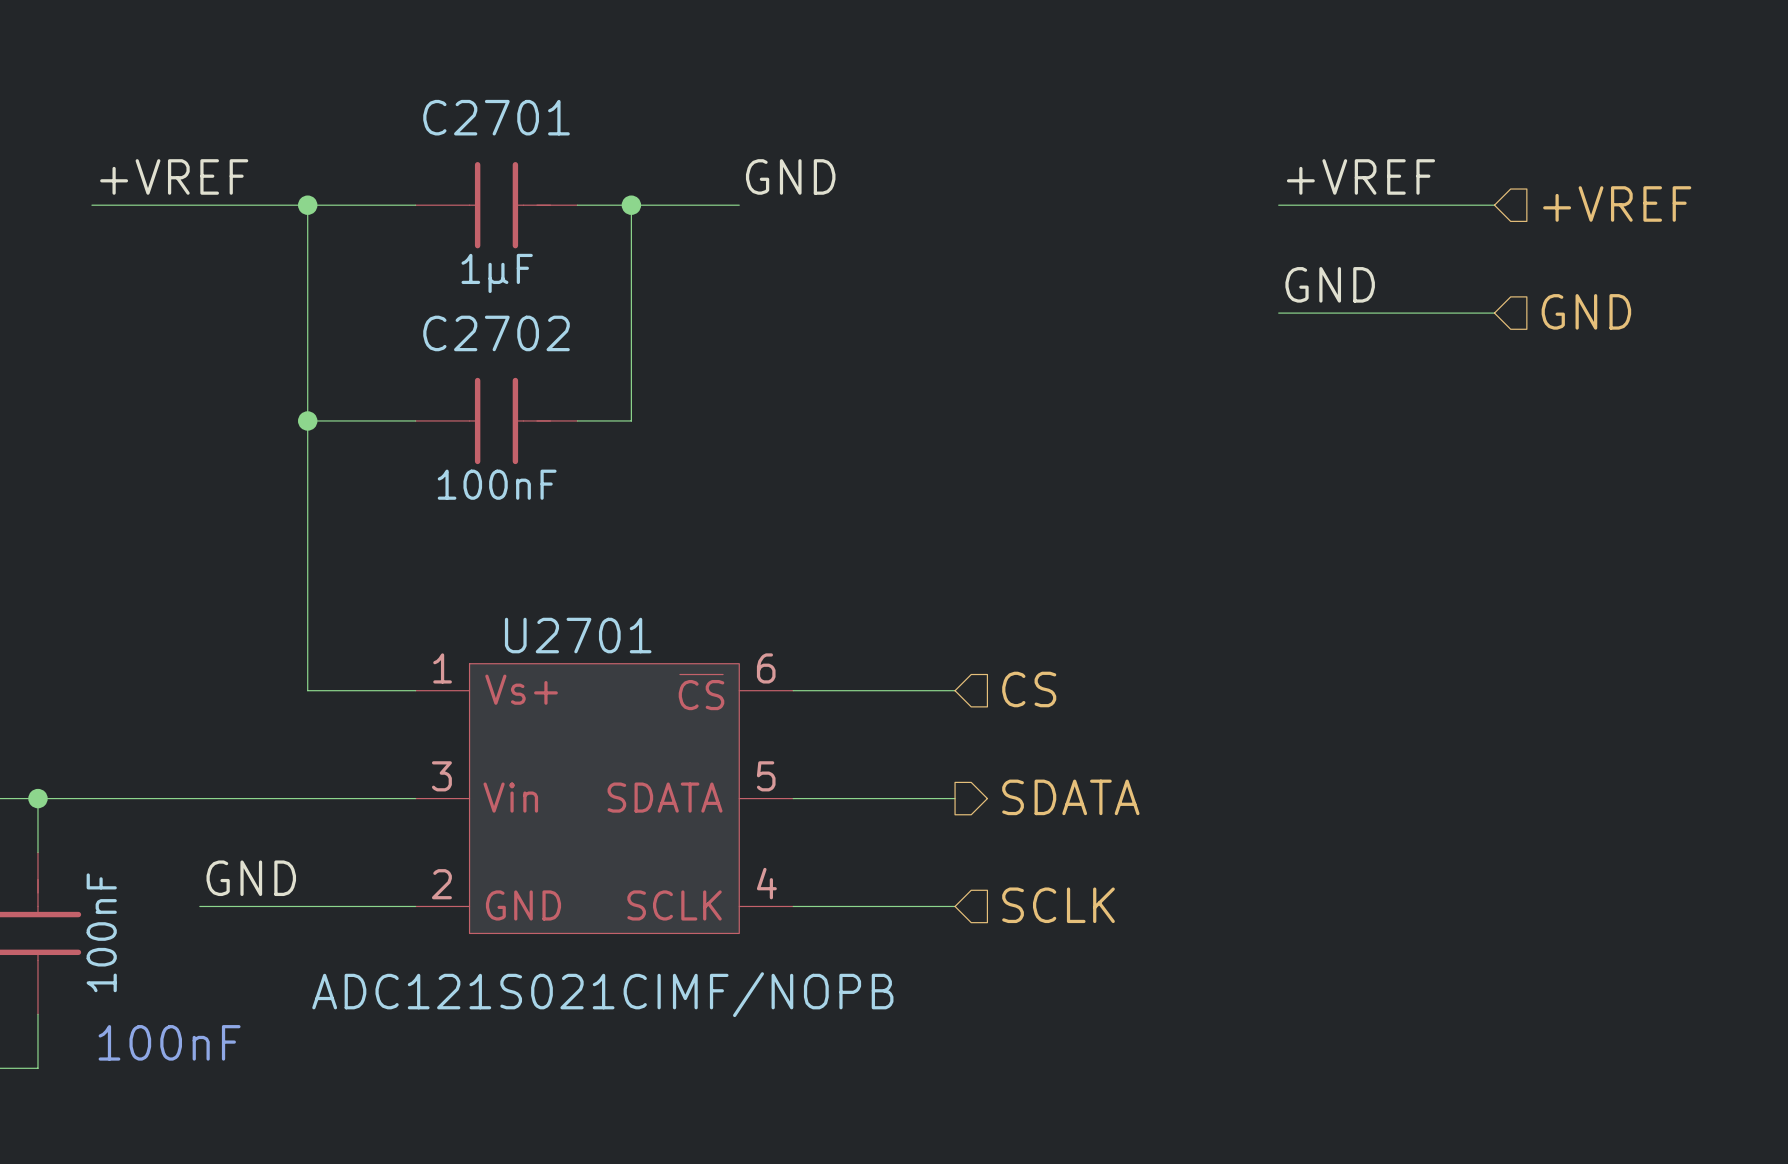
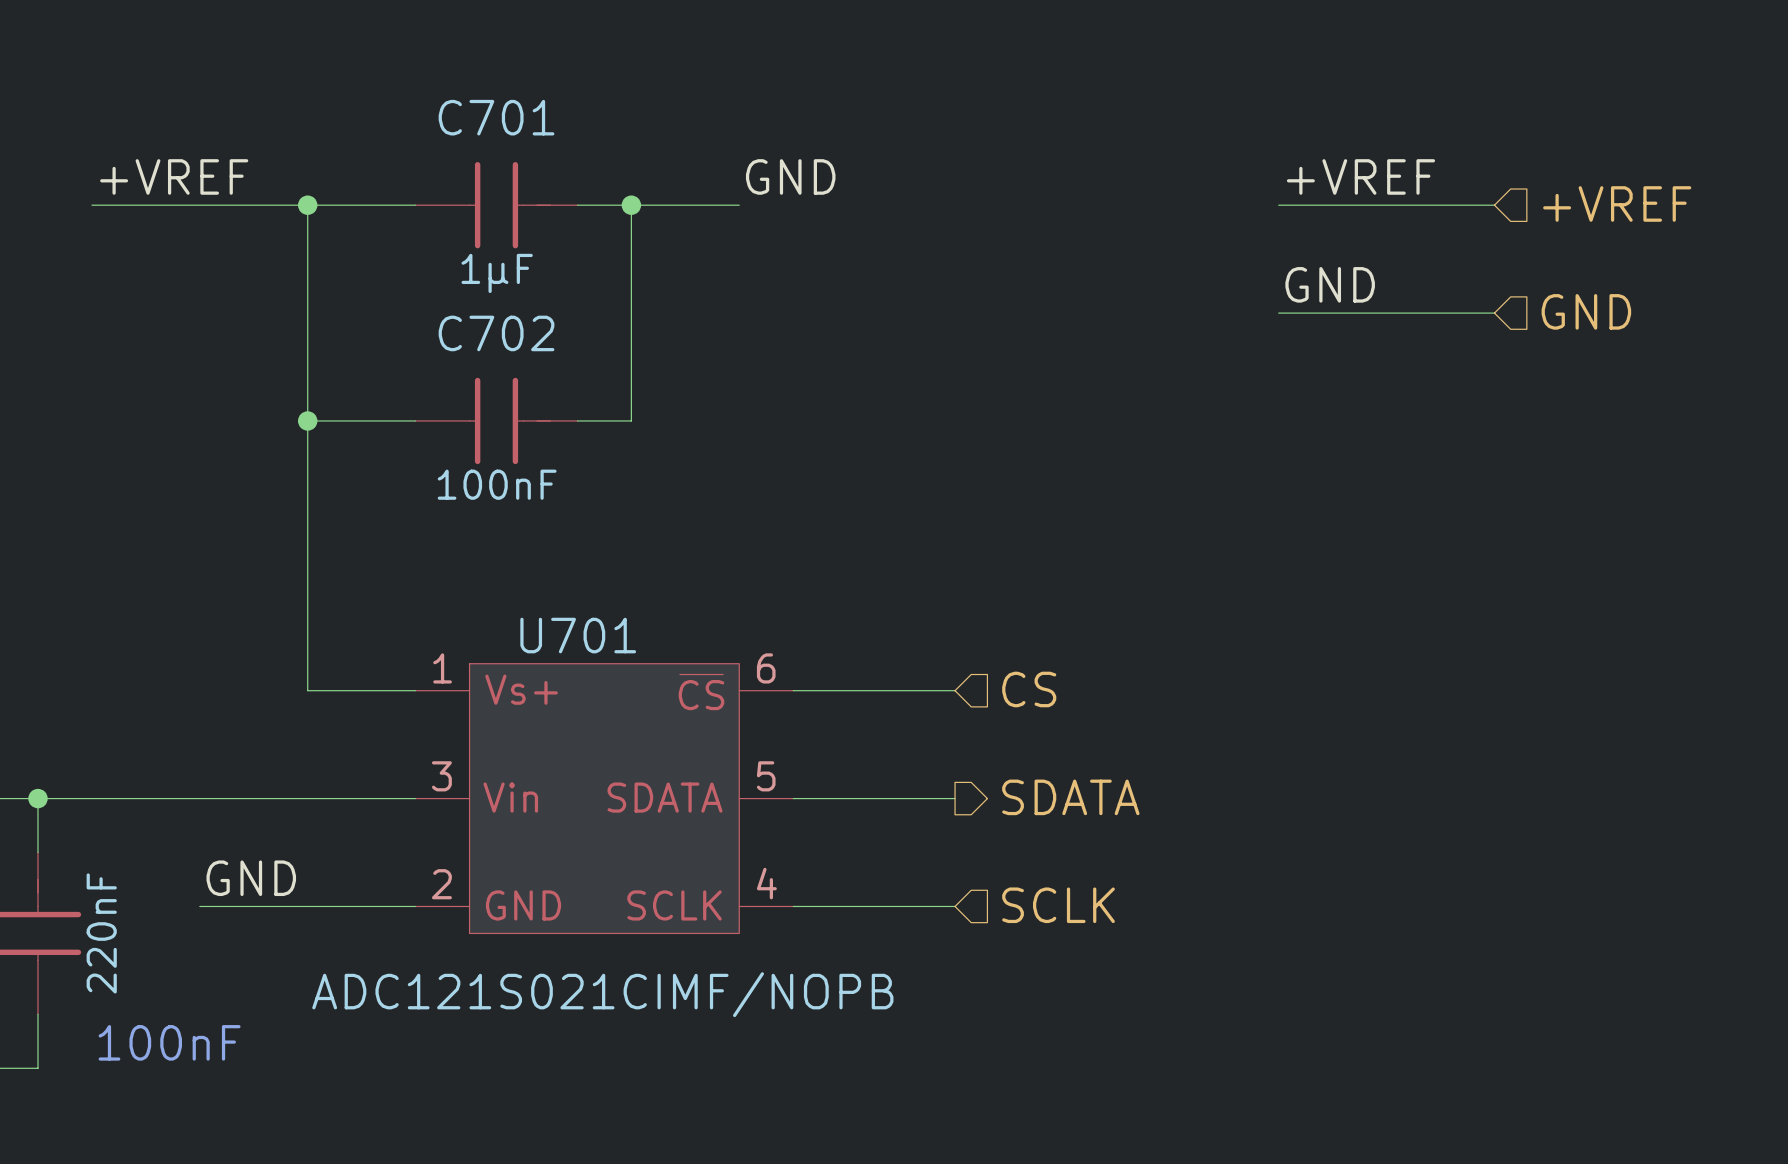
C2701 name: C2701 (496, 117) -> C701 (496, 117)
C2702 name: C2702 (496, 333) -> C702 (496, 333)
U2701 name: U2701 (578, 635) -> U701 (578, 635)
part text: 100nF (101, 932) -> 220nF (101, 933)

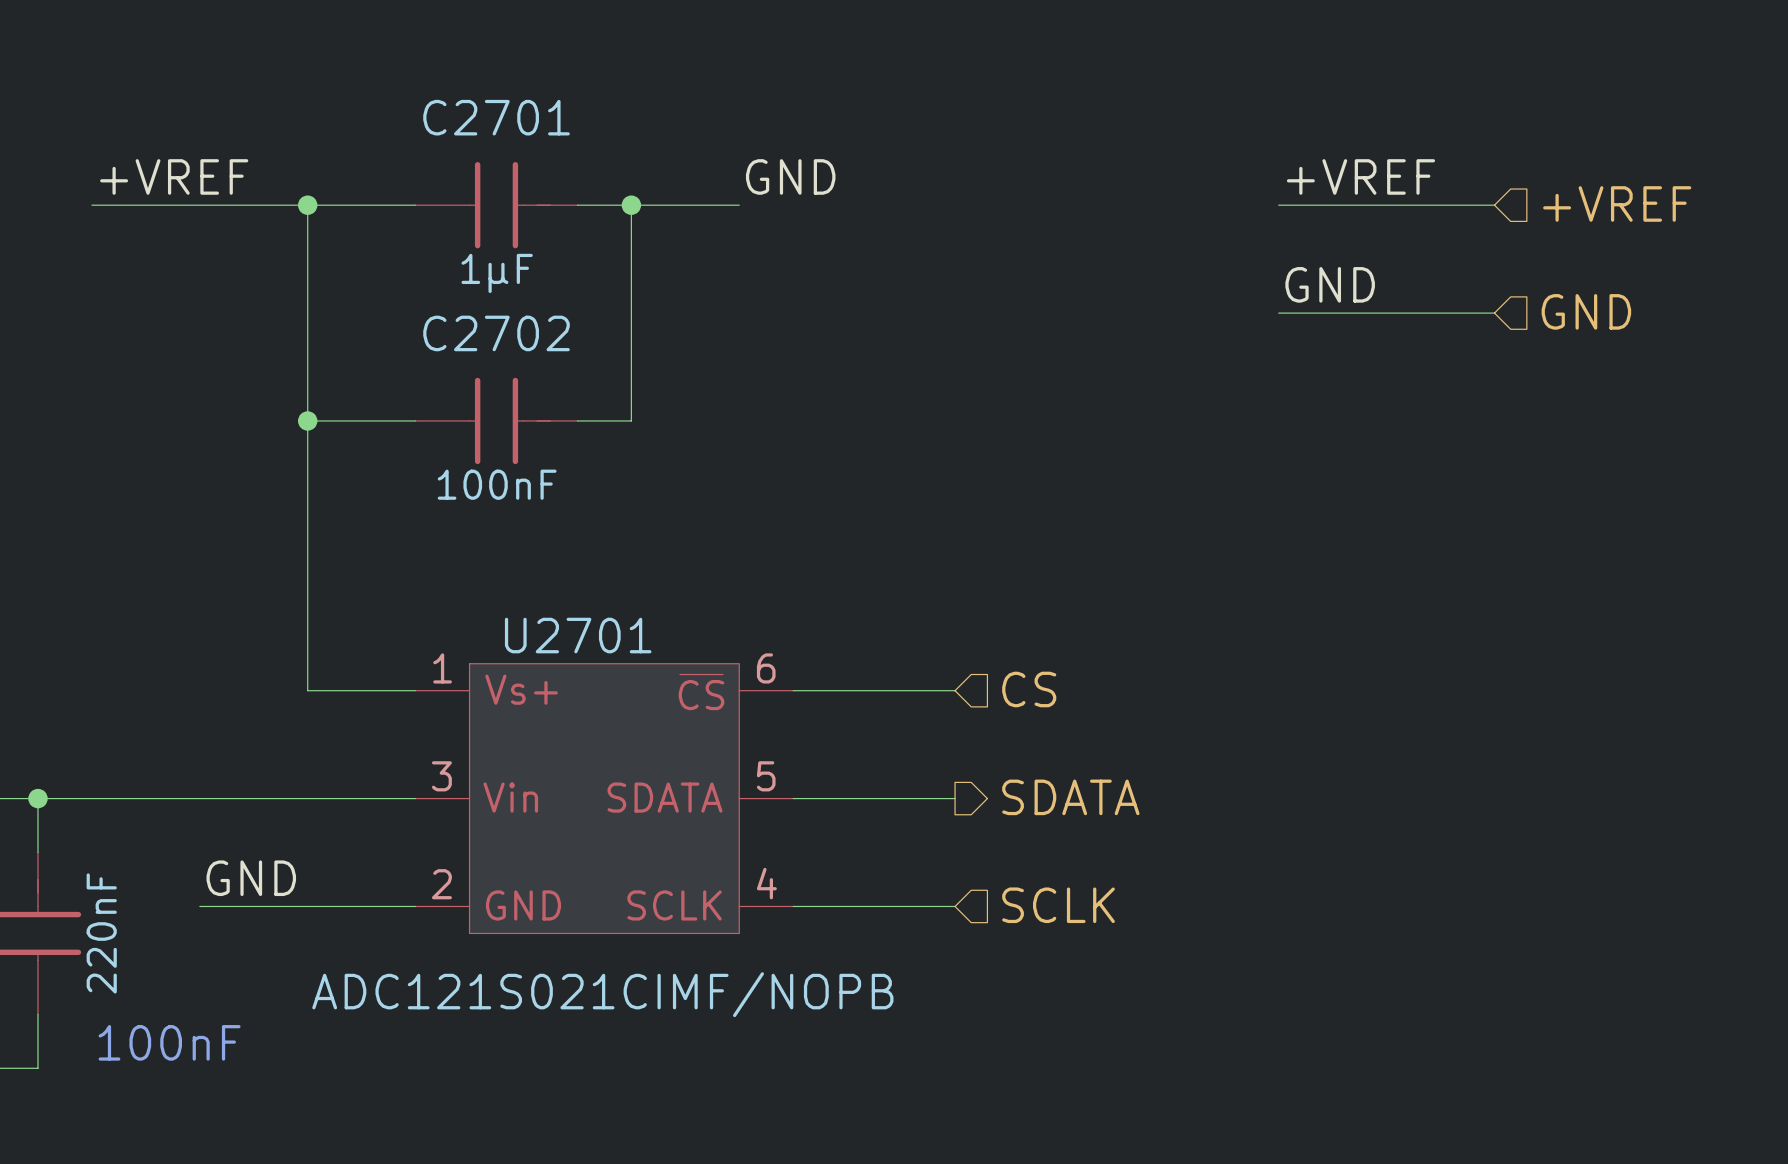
C701 name: C701 (496, 117) -> C2701 (496, 117)
C702 name: C702 (496, 333) -> C2702 (496, 333)
U701 name: U701 (578, 635) -> U2701 (578, 635)

